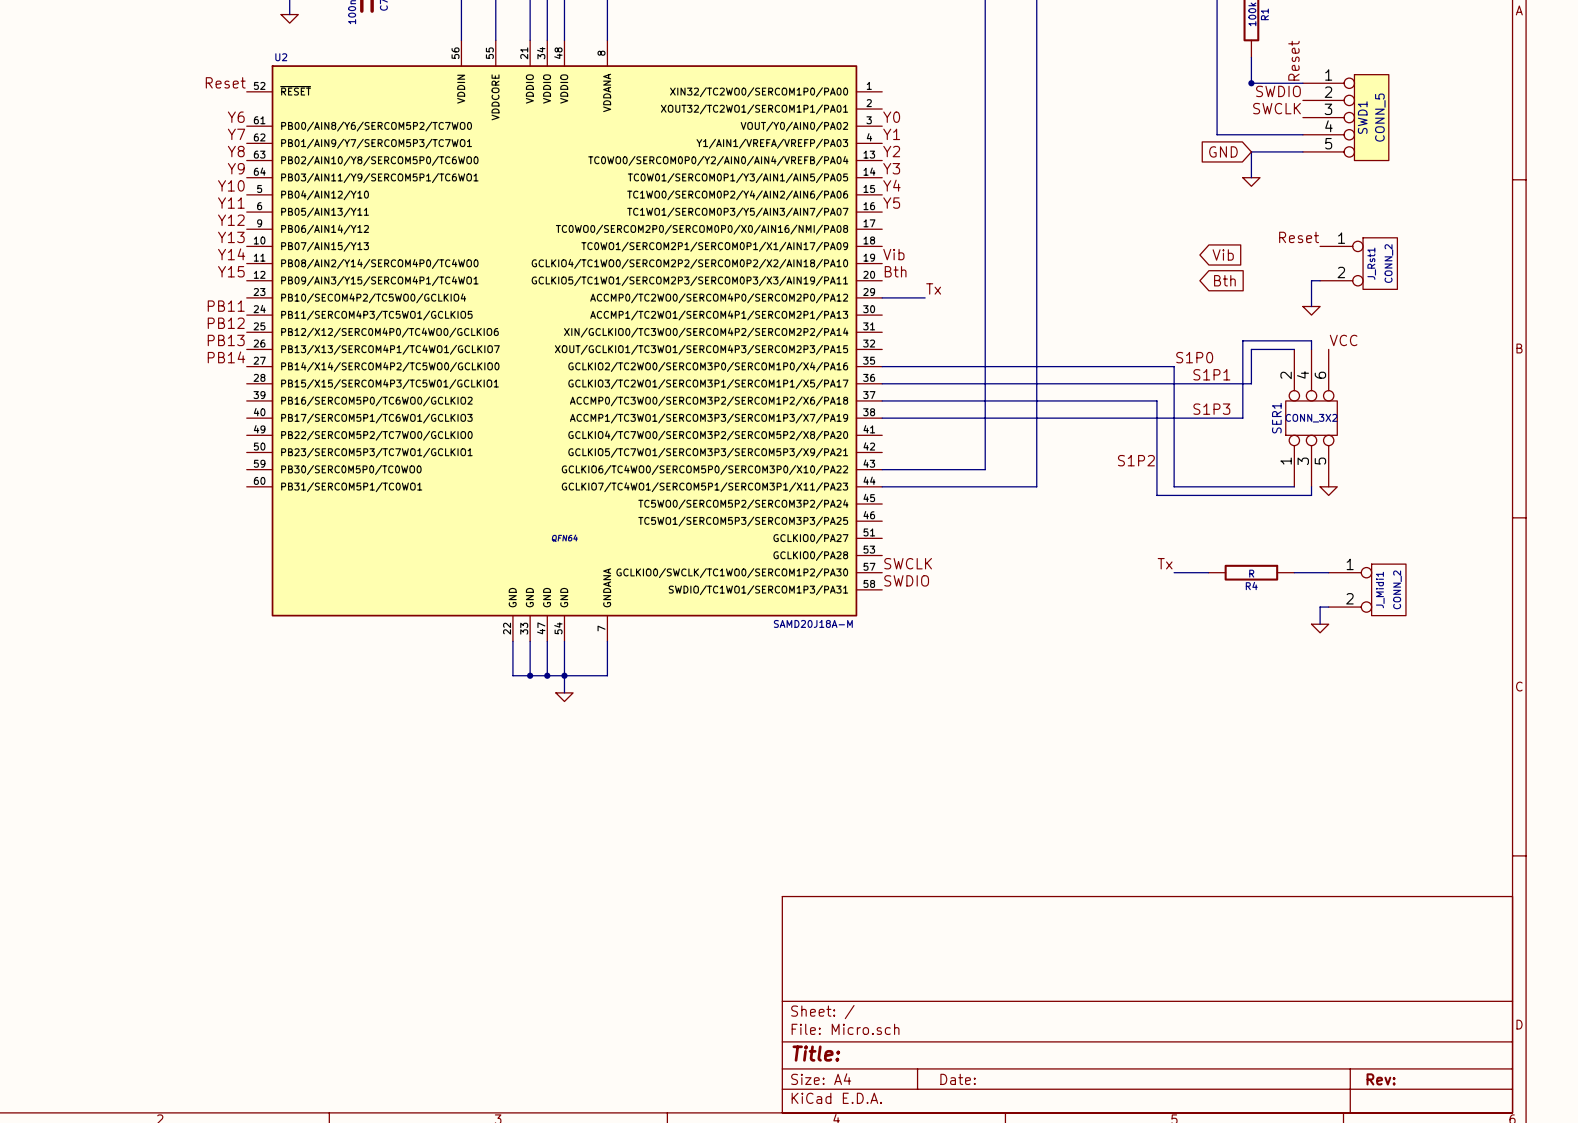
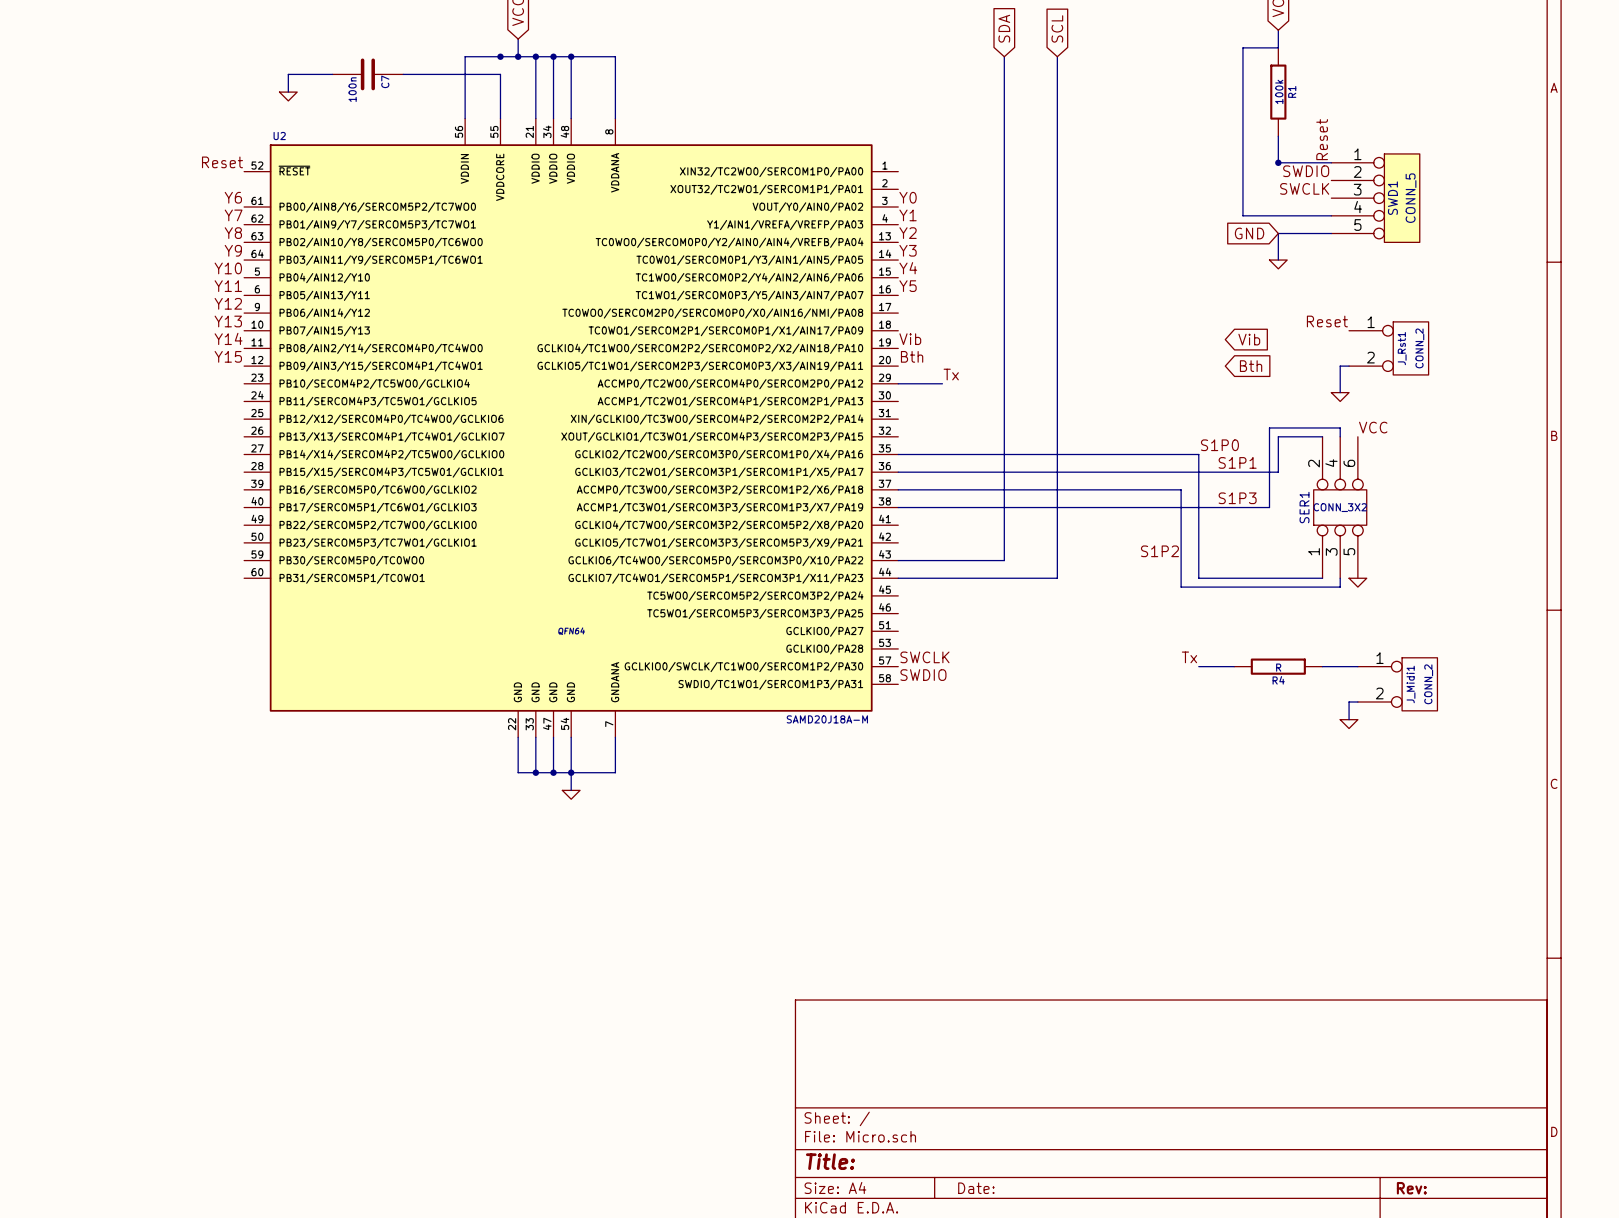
label: PB11 (226, 306) -> none
label: PB12 (226, 323) -> none
label: PB13 (226, 340) -> none
label: PB14 (226, 357) -> none

